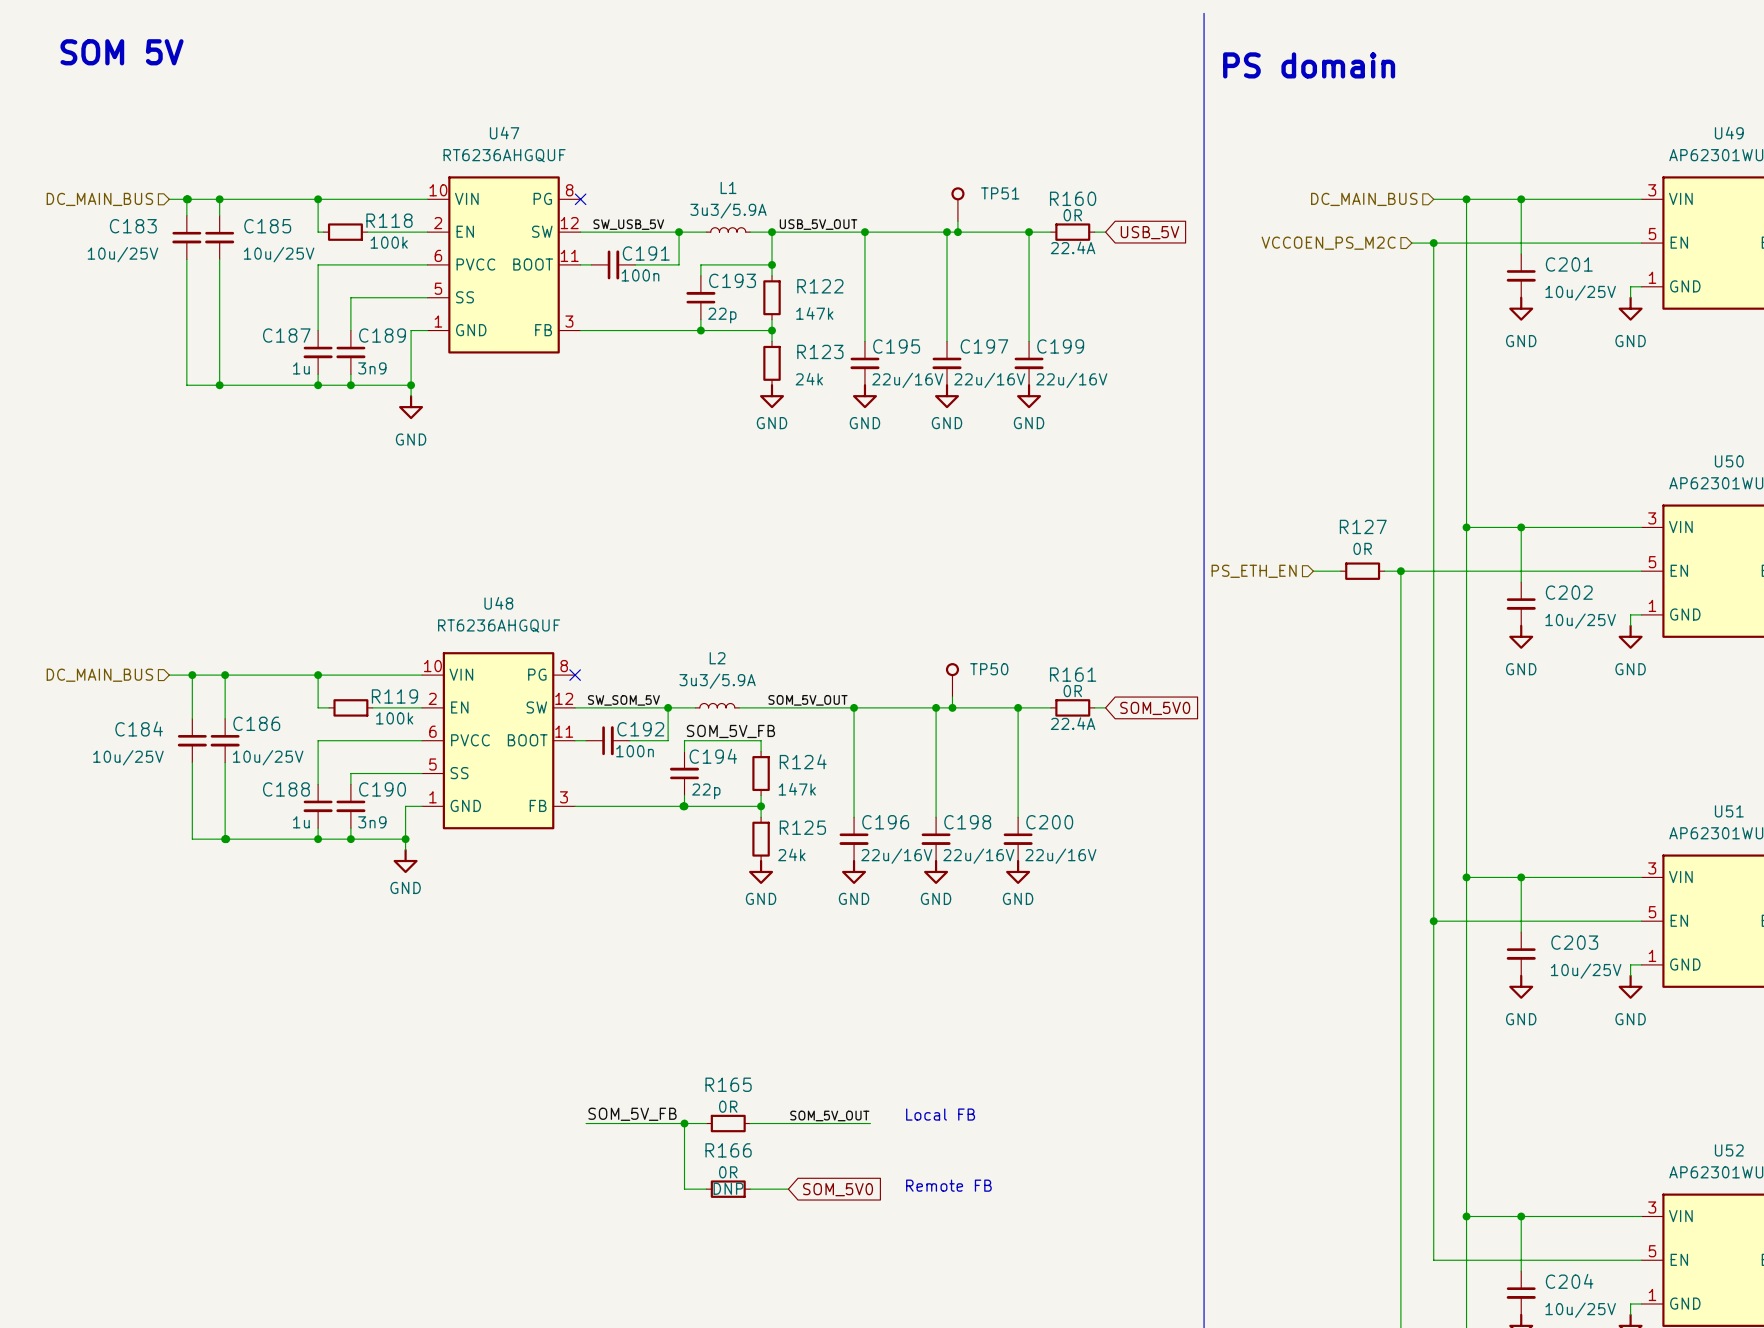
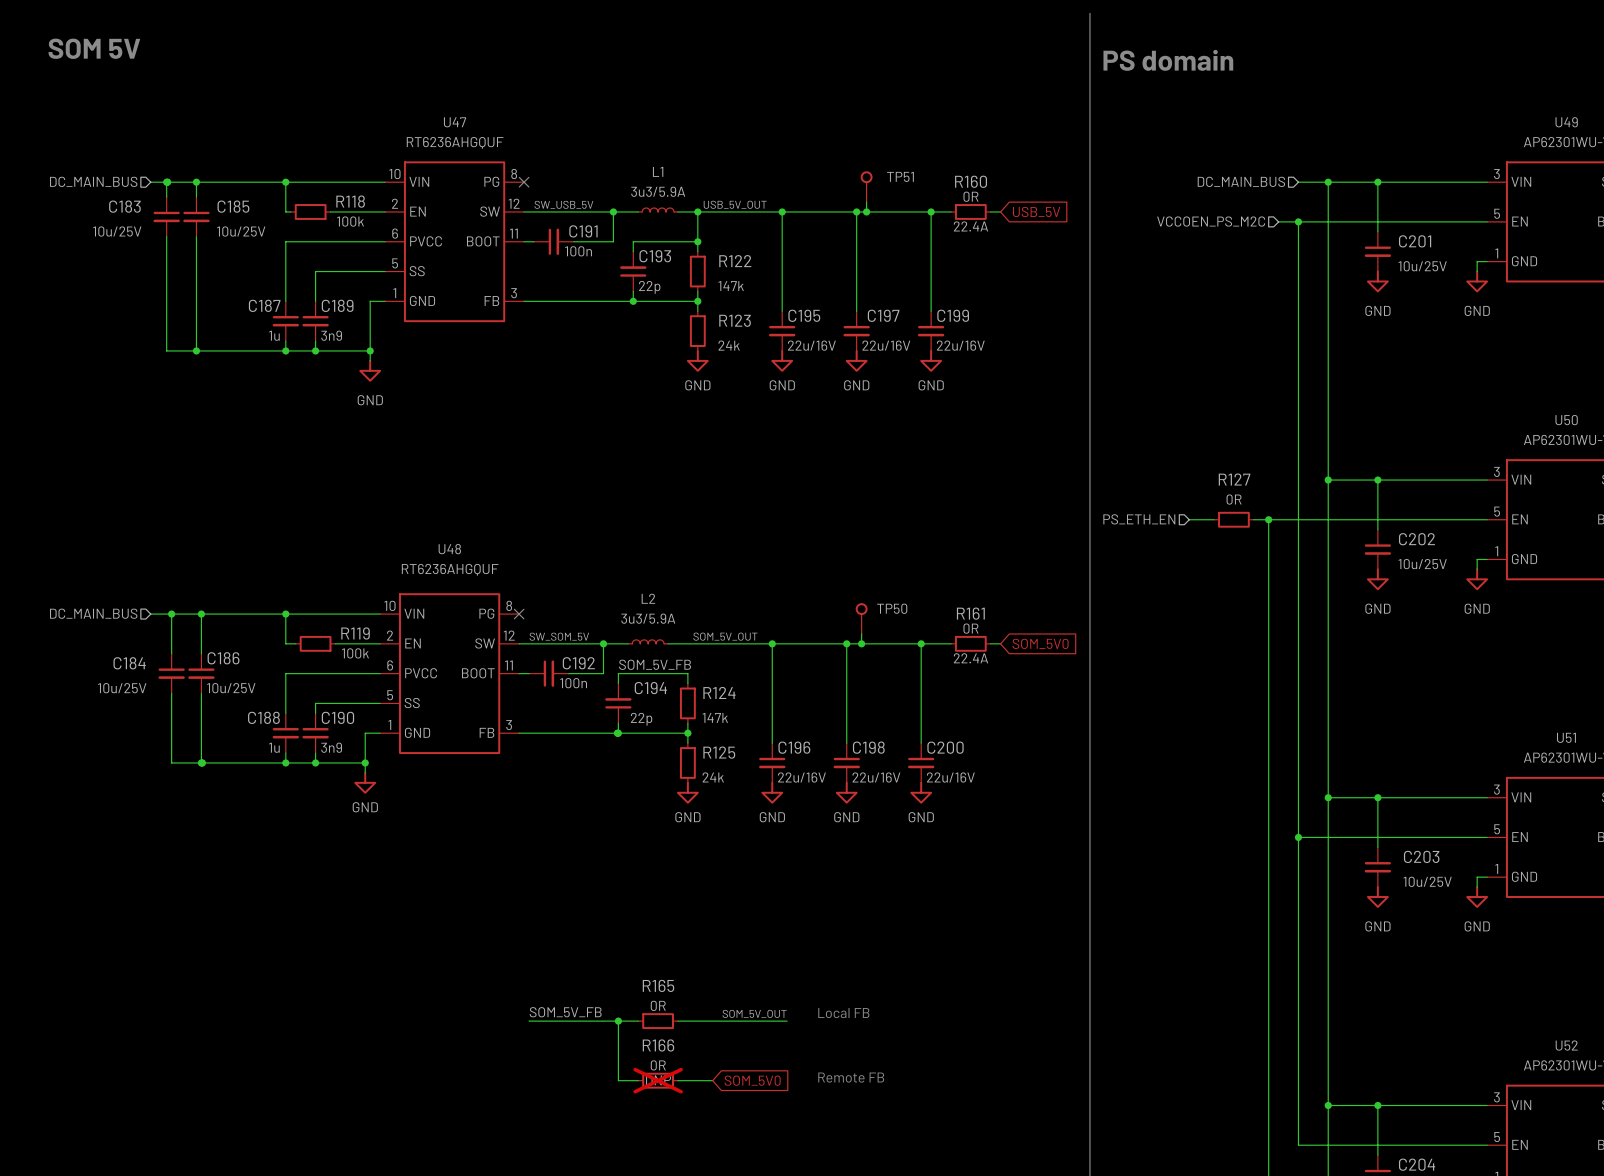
R166 do-not-place cross: none -> (658, 1080)

